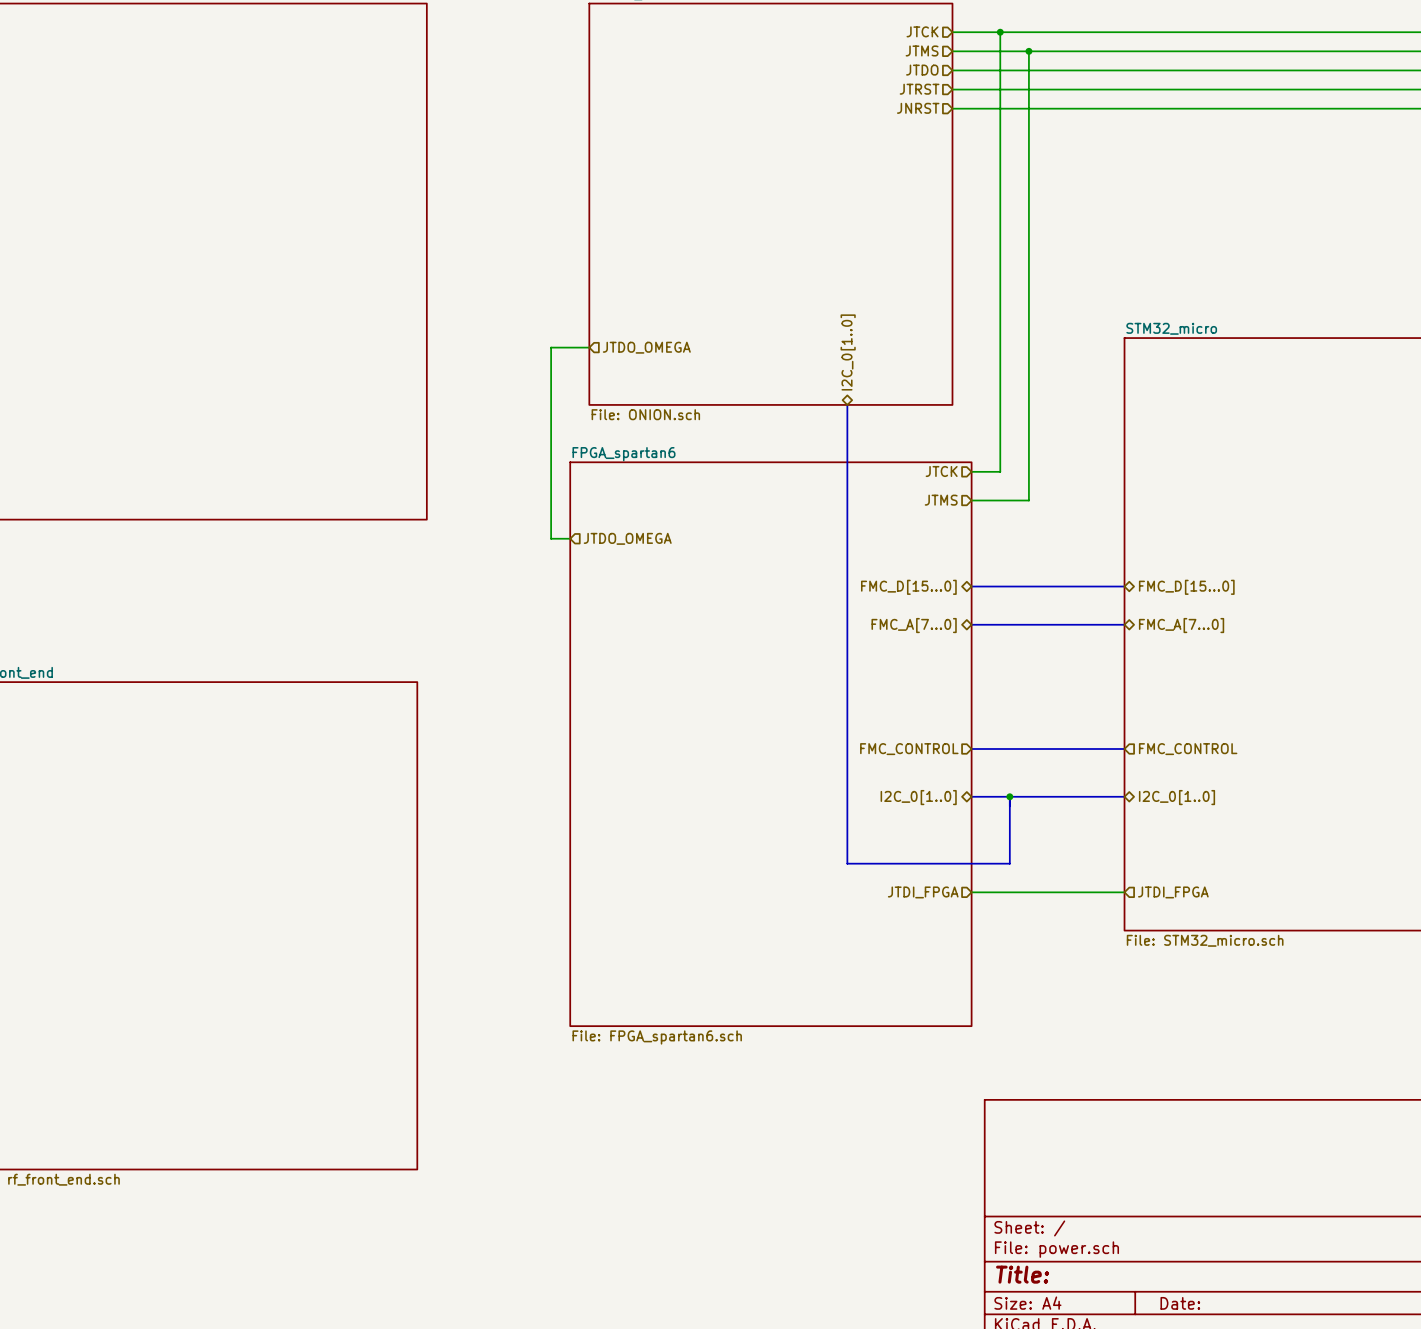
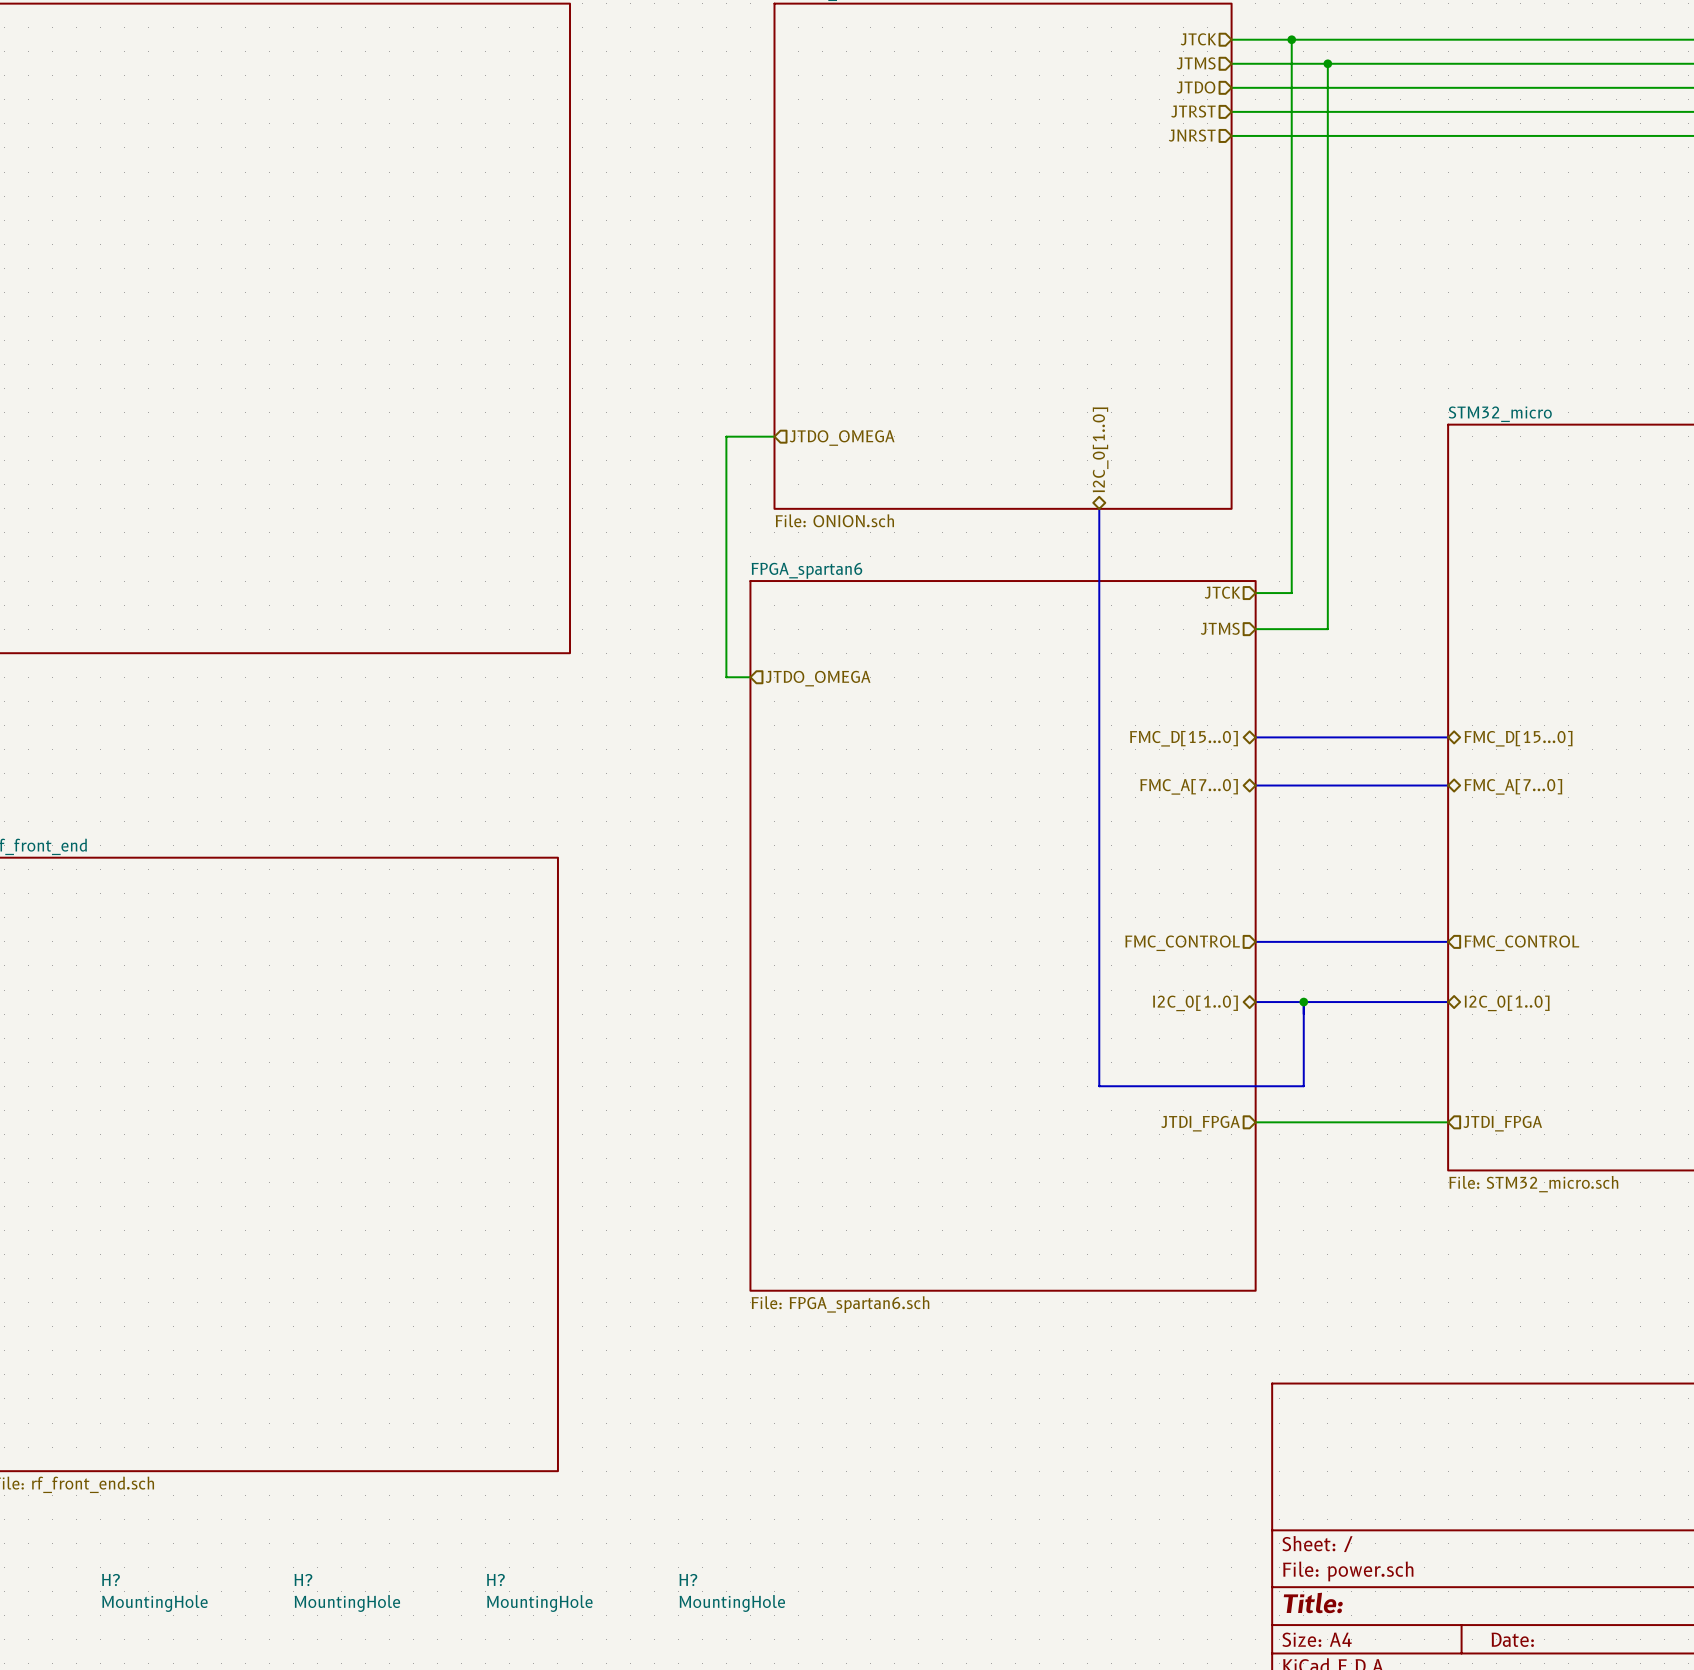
H?: none -> MountingHole (154, 1592)
H?: none -> MountingHole (347, 1592)
H?: none -> MountingHole (539, 1592)
H?: none -> MountingHole (732, 1592)

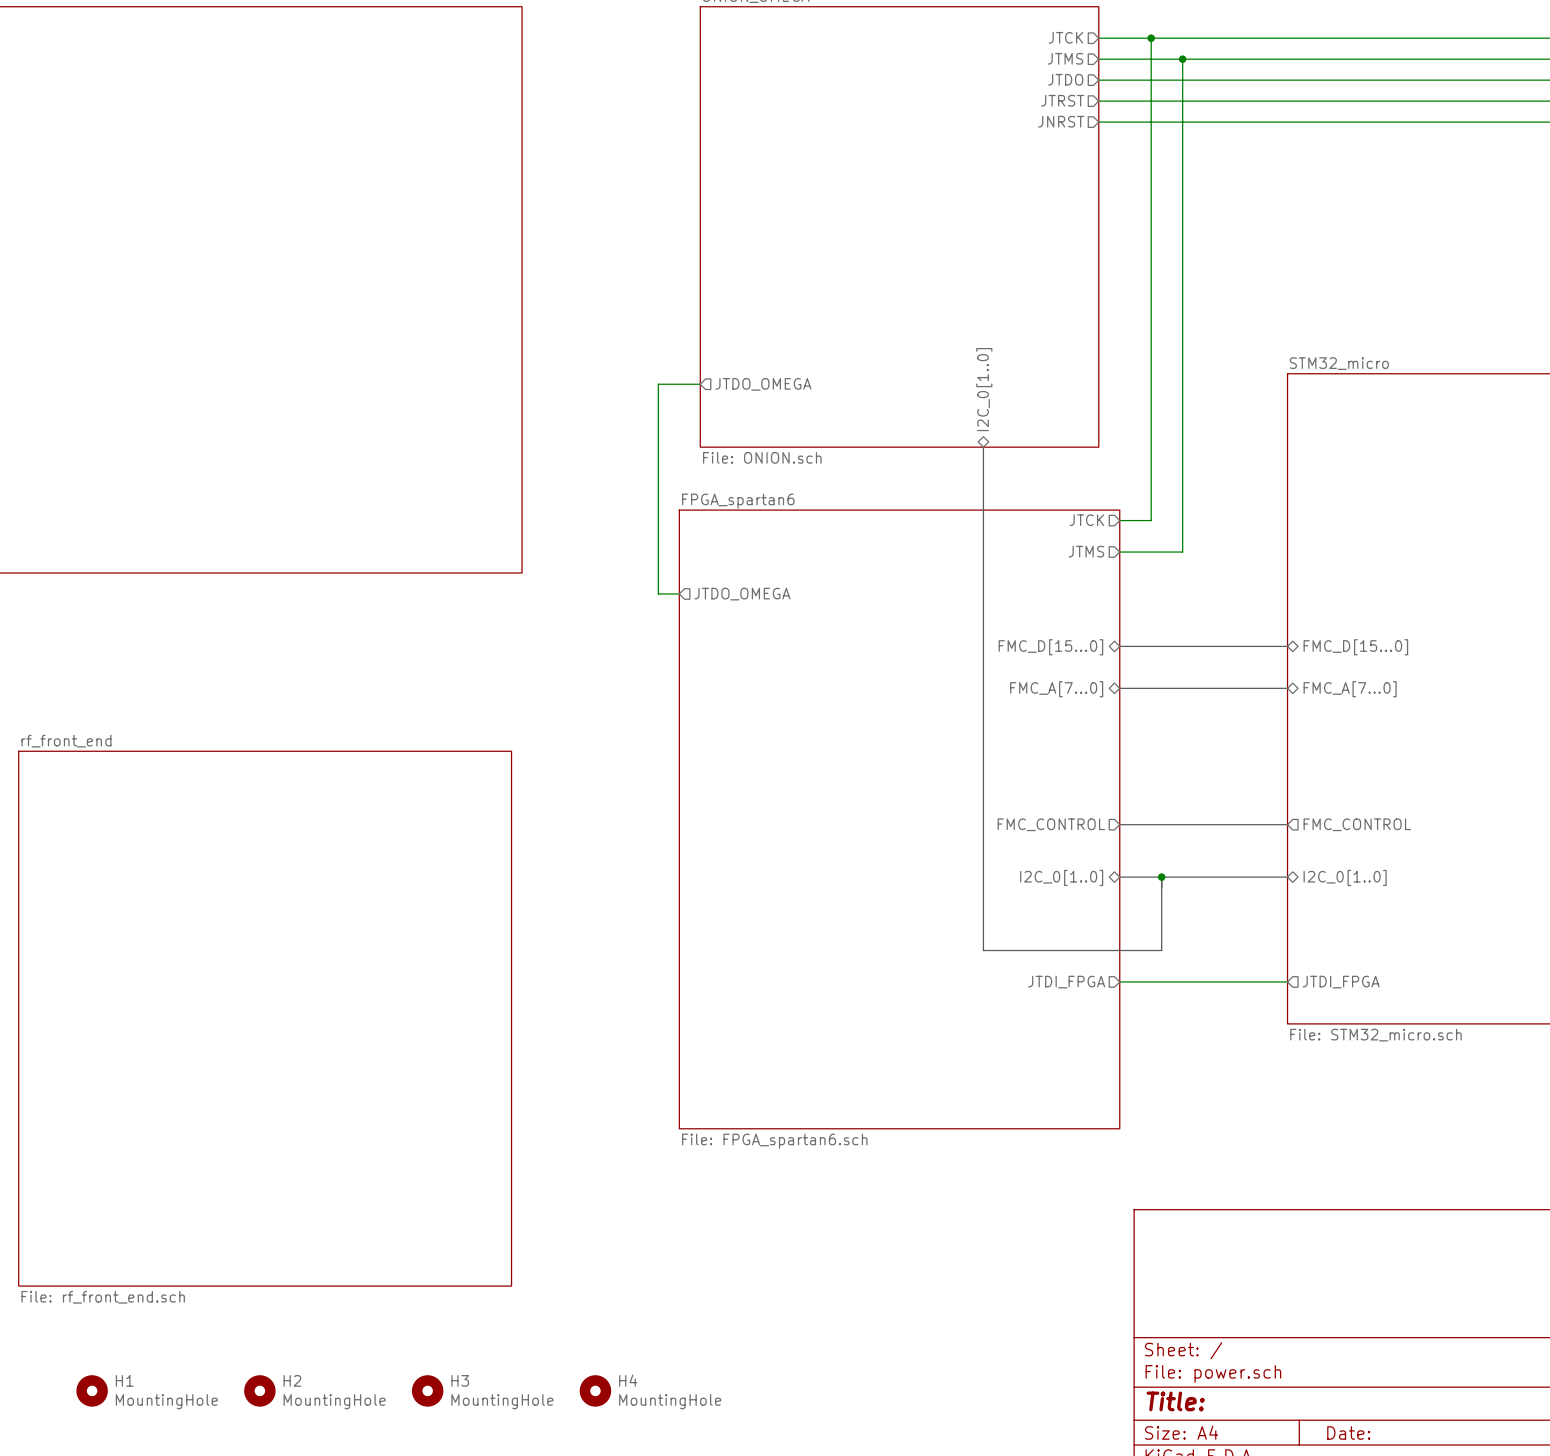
H1: none -> MountingHole (92, 1390)
H2: none -> MountingHole (259, 1390)
H3: none -> MountingHole (427, 1390)
H4: none -> MountingHole (595, 1390)
H?: MountingHole (154, 1592) -> none
H?: MountingHole (347, 1592) -> none
H?: MountingHole (539, 1592) -> none
H?: MountingHole (732, 1592) -> none

